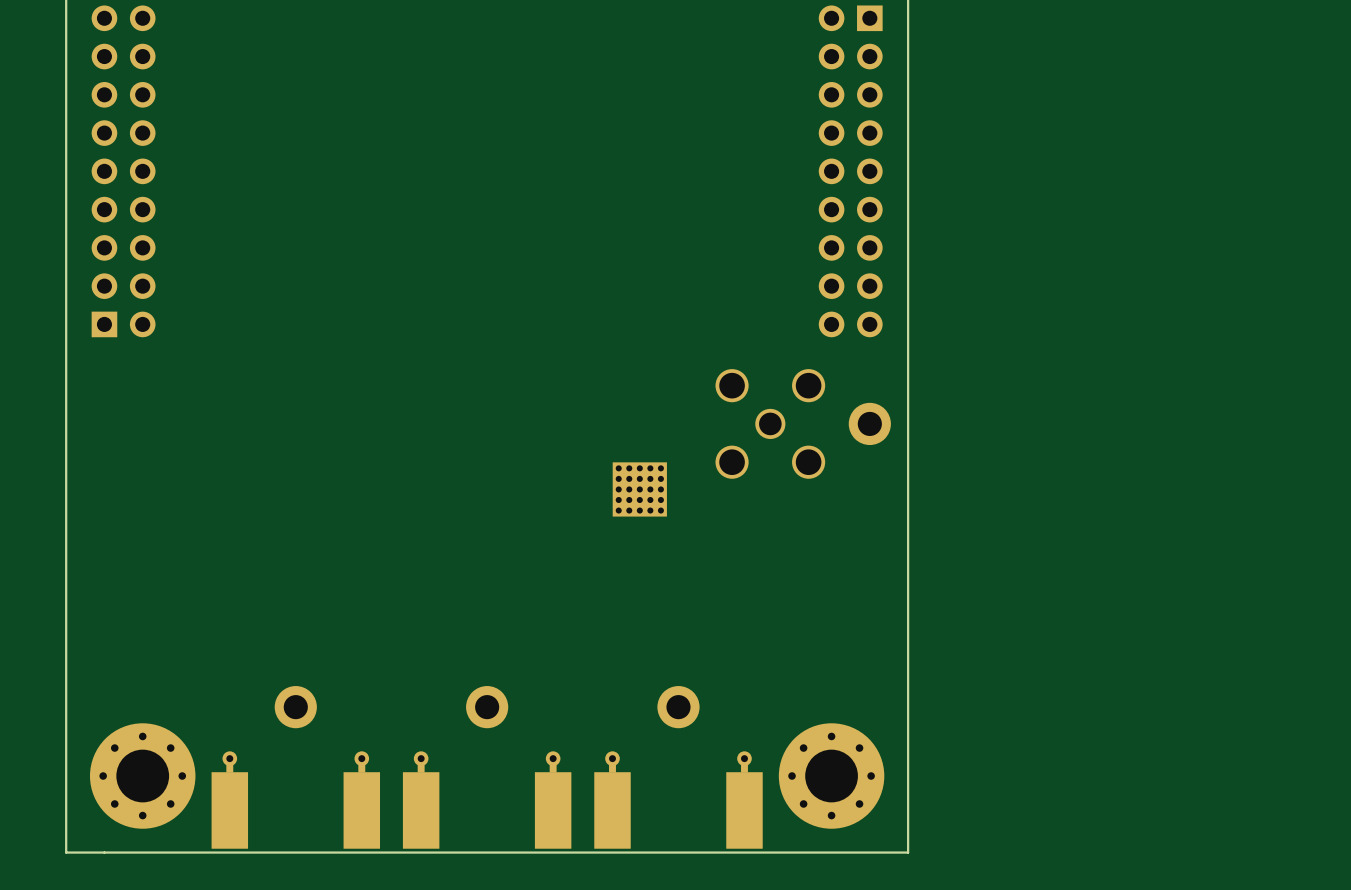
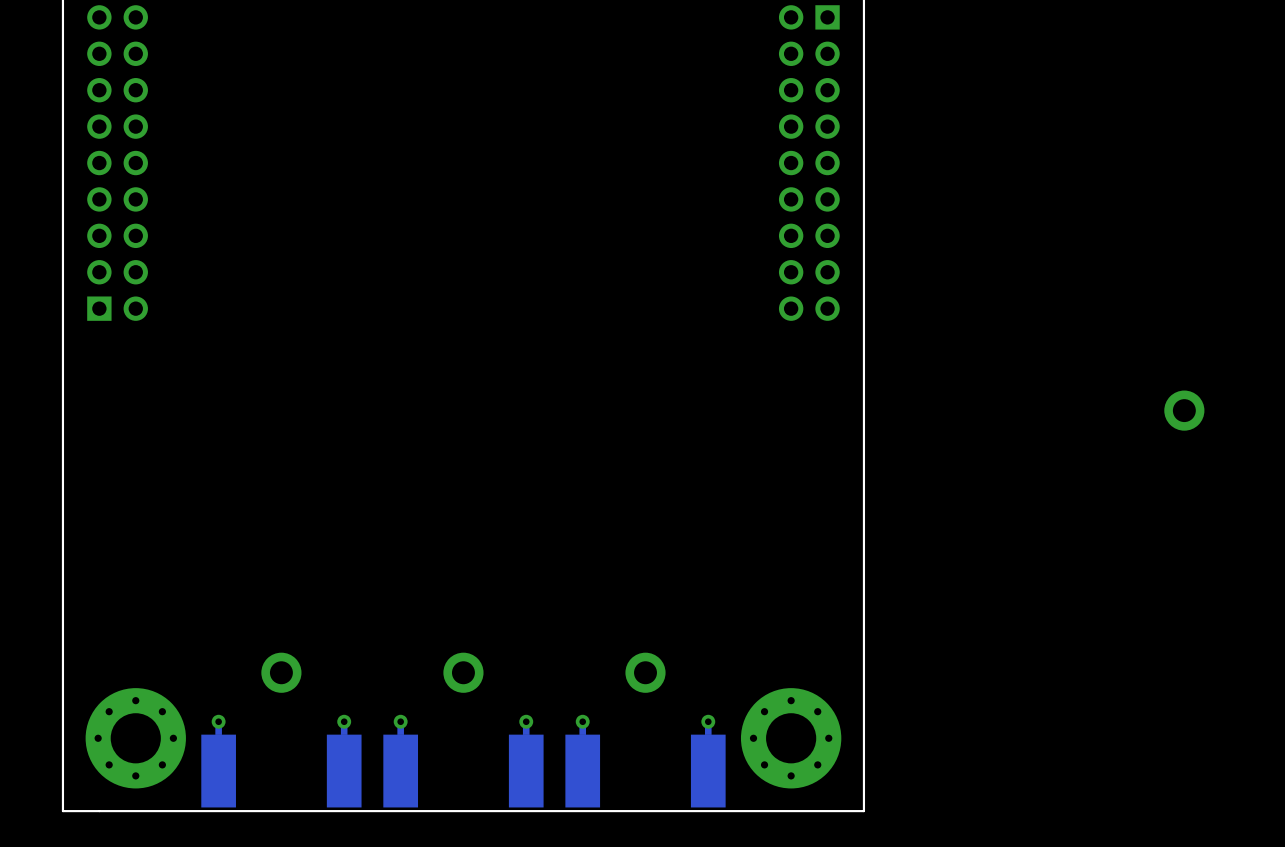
part: (770, 423) -> none
part position: (869, 423) -> (1184, 410)
part: (639, 489) -> none

